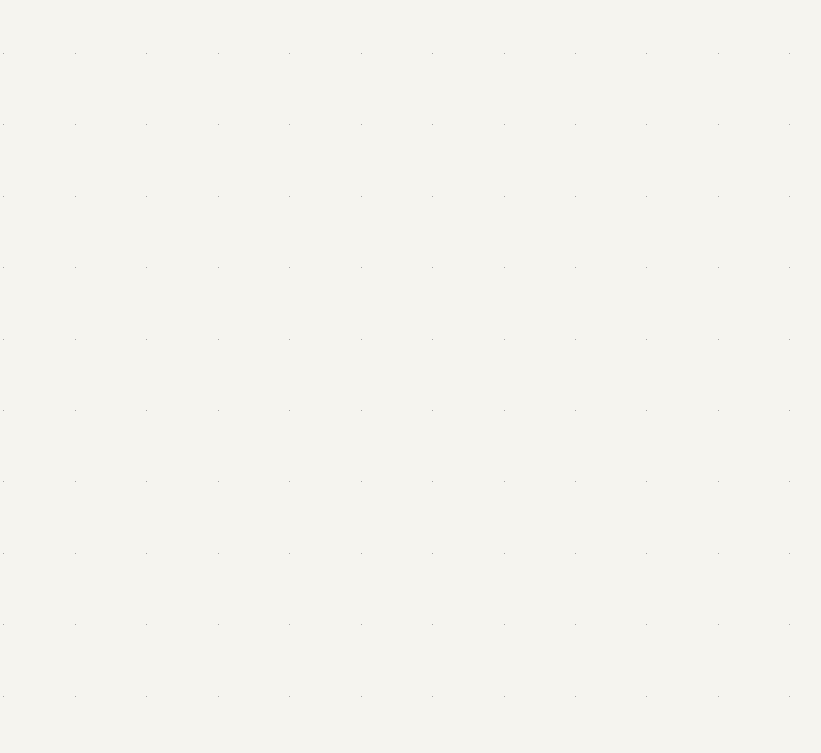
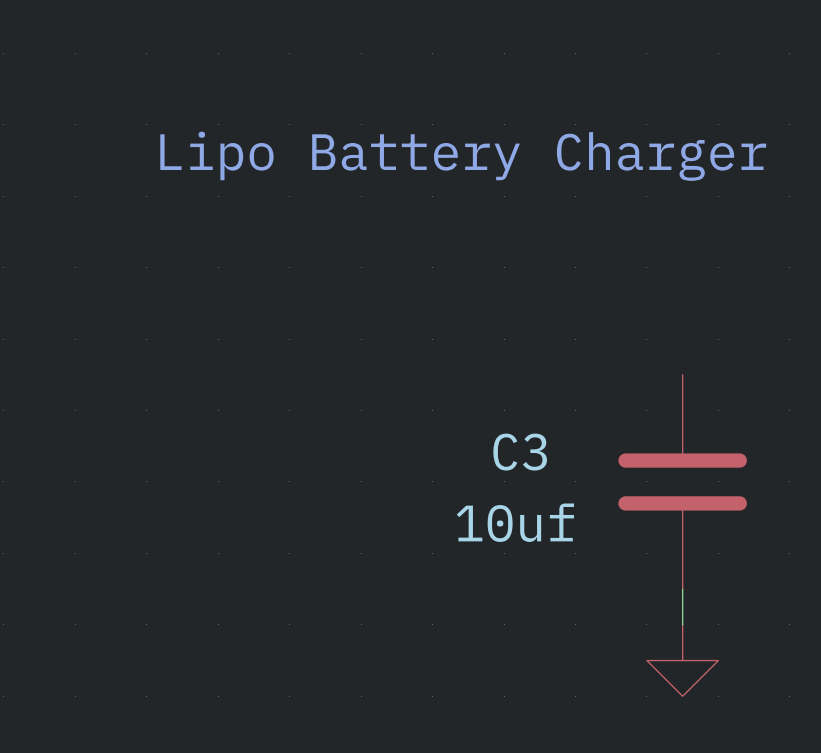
text: none -> Lipo Battery Charger (463, 156)
C3: none -> 10uf (682, 481)
wire: none -> (682, 589) (682, 624)
power symbol: none -> (682, 660)

